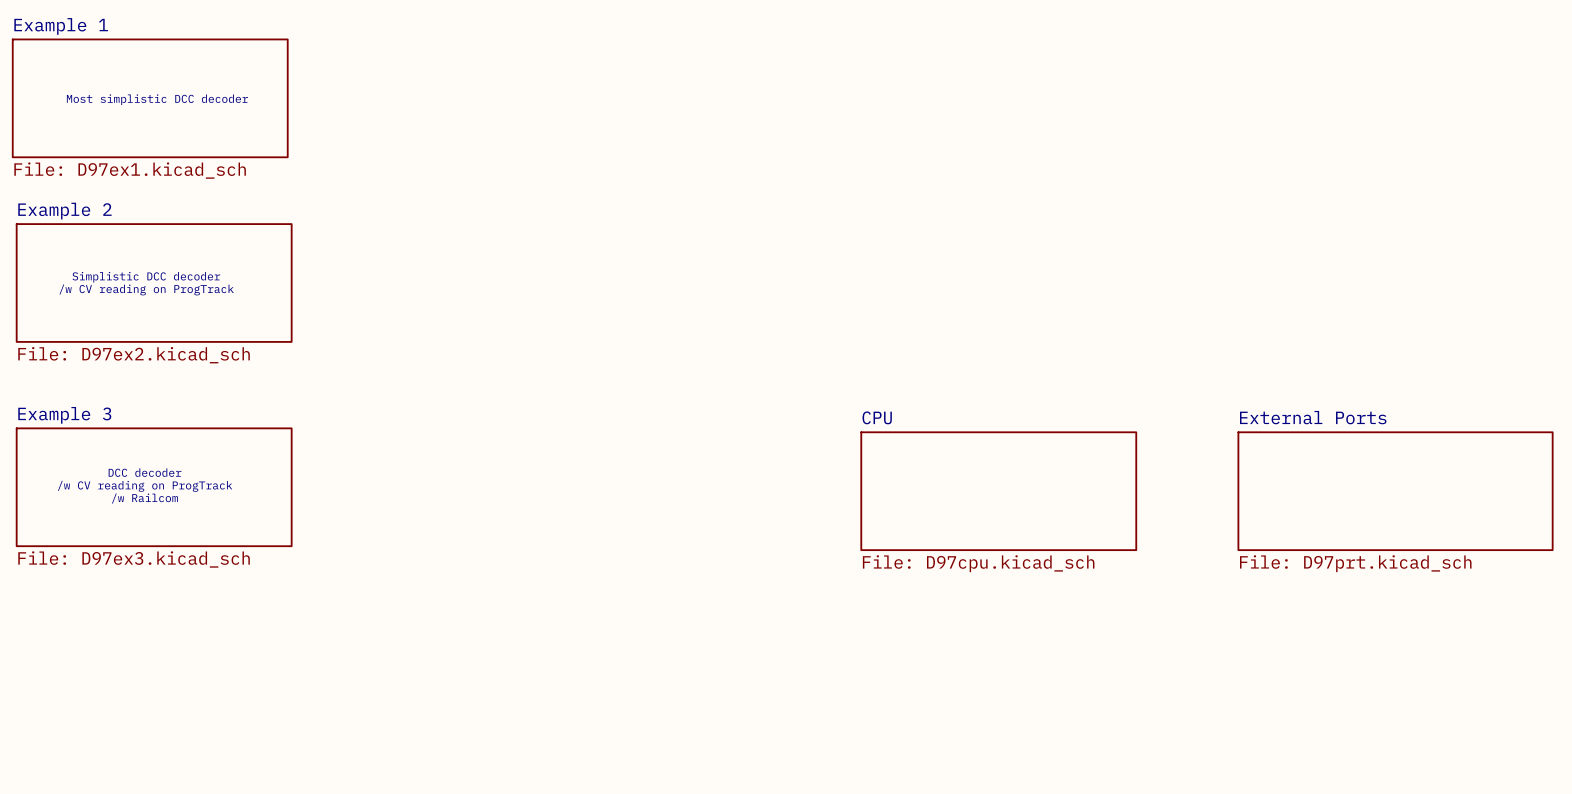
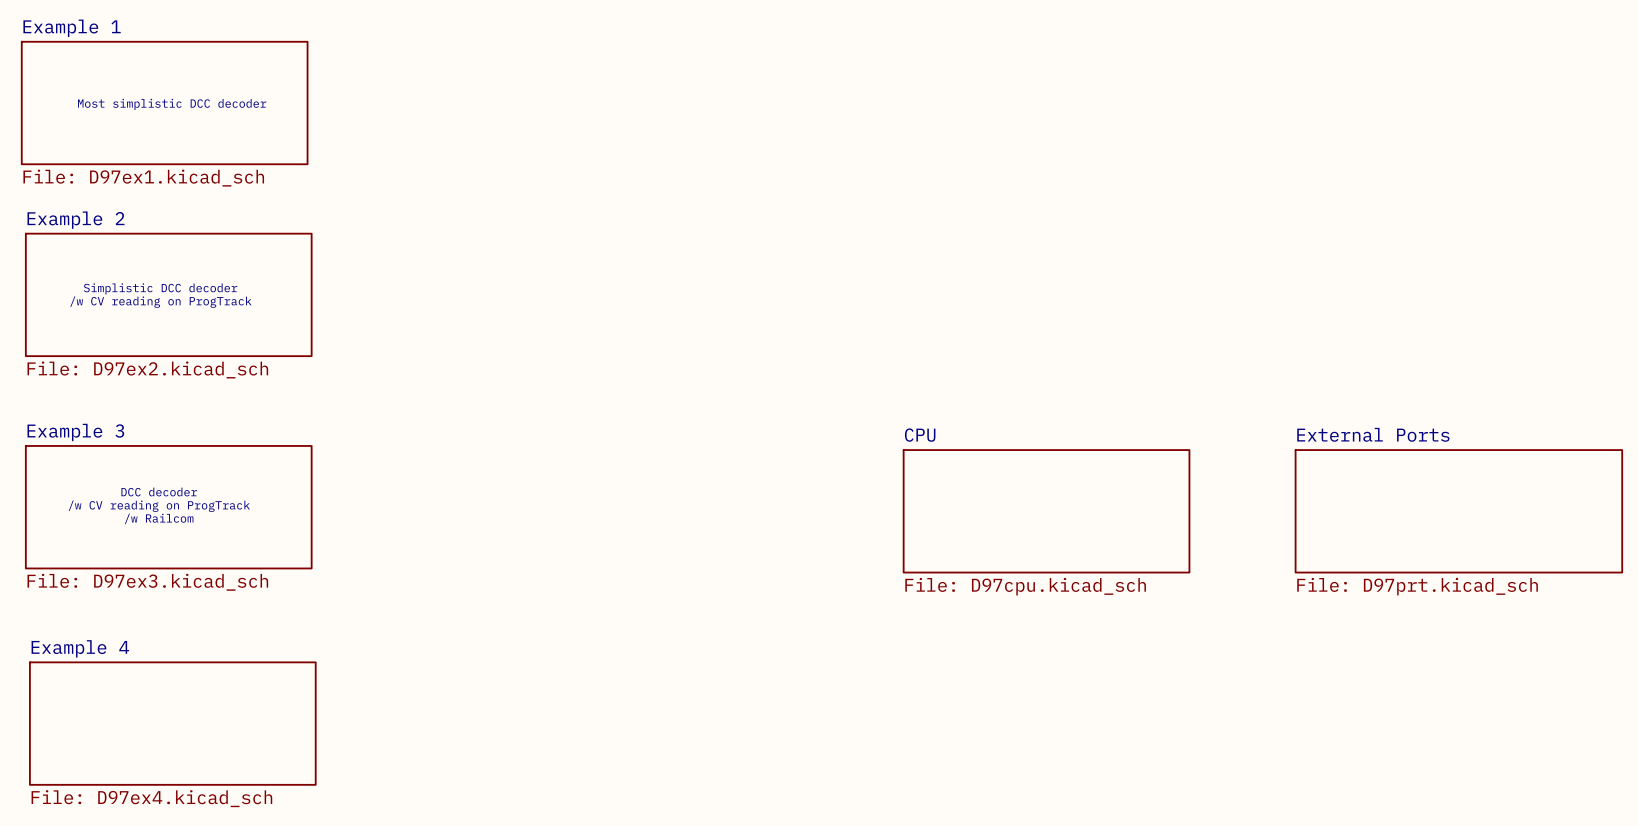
sheet Example 4: none -> File: D97ex4.kicad_sch (172, 723)

